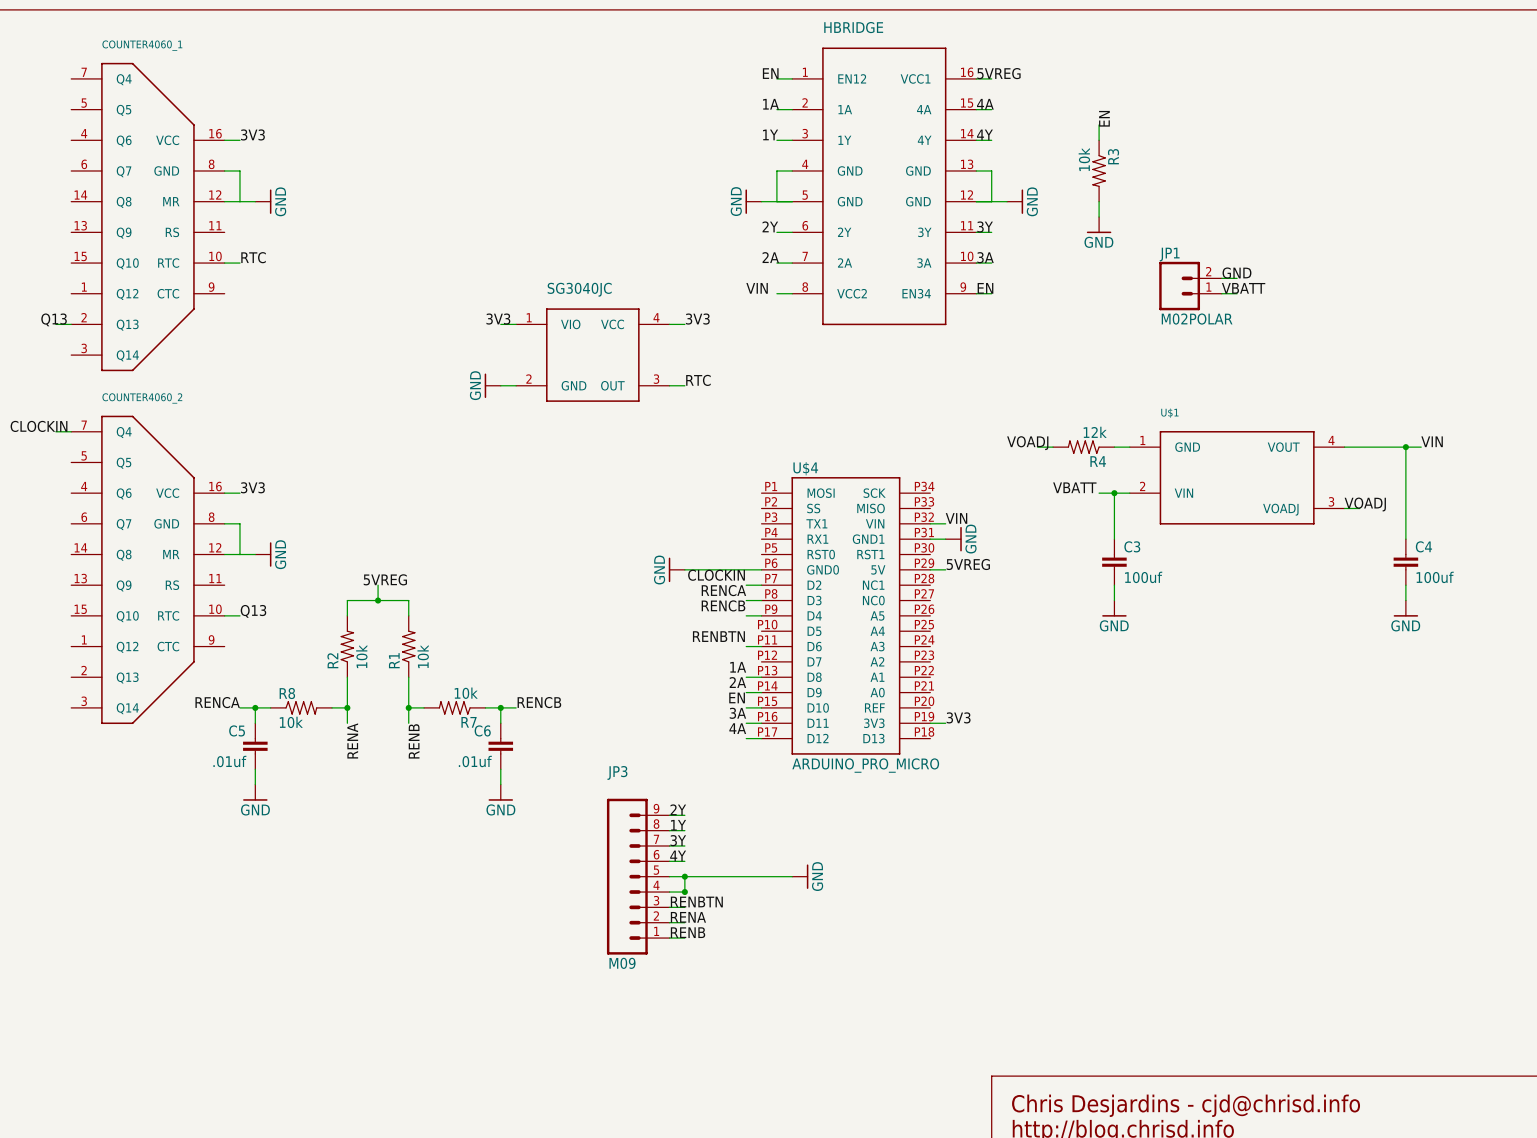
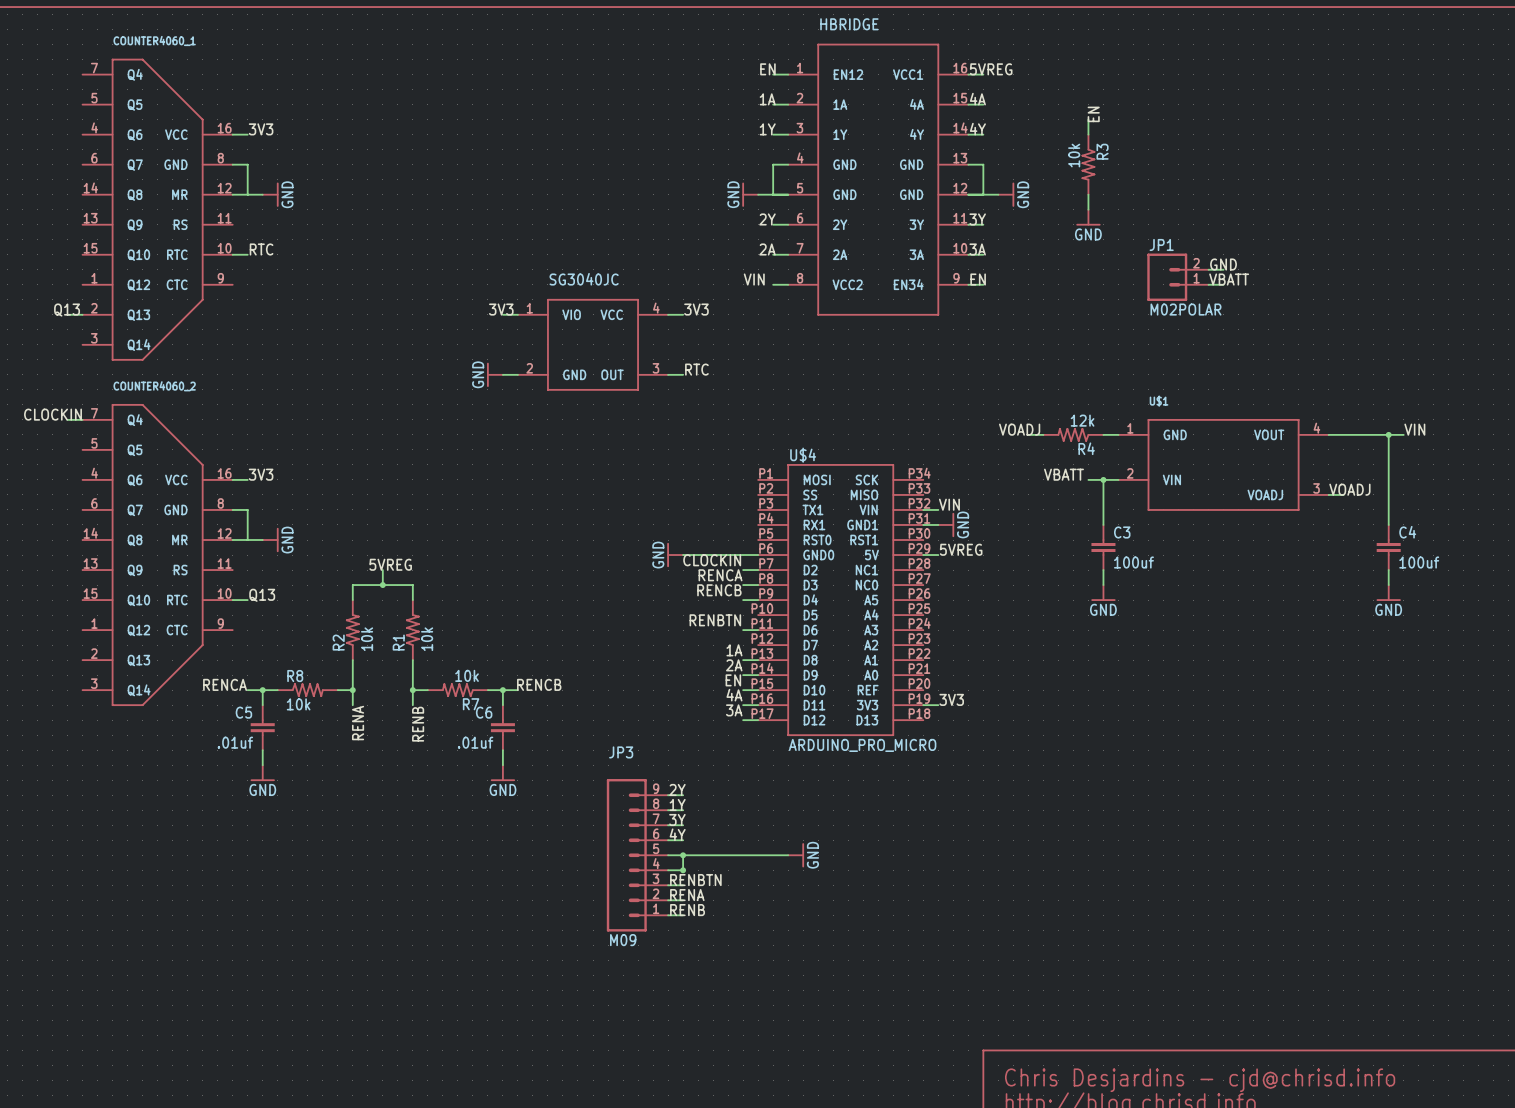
label: 3A (737, 713) -> 4A (734, 695)
label: 4A (737, 728) -> 3A (734, 710)

